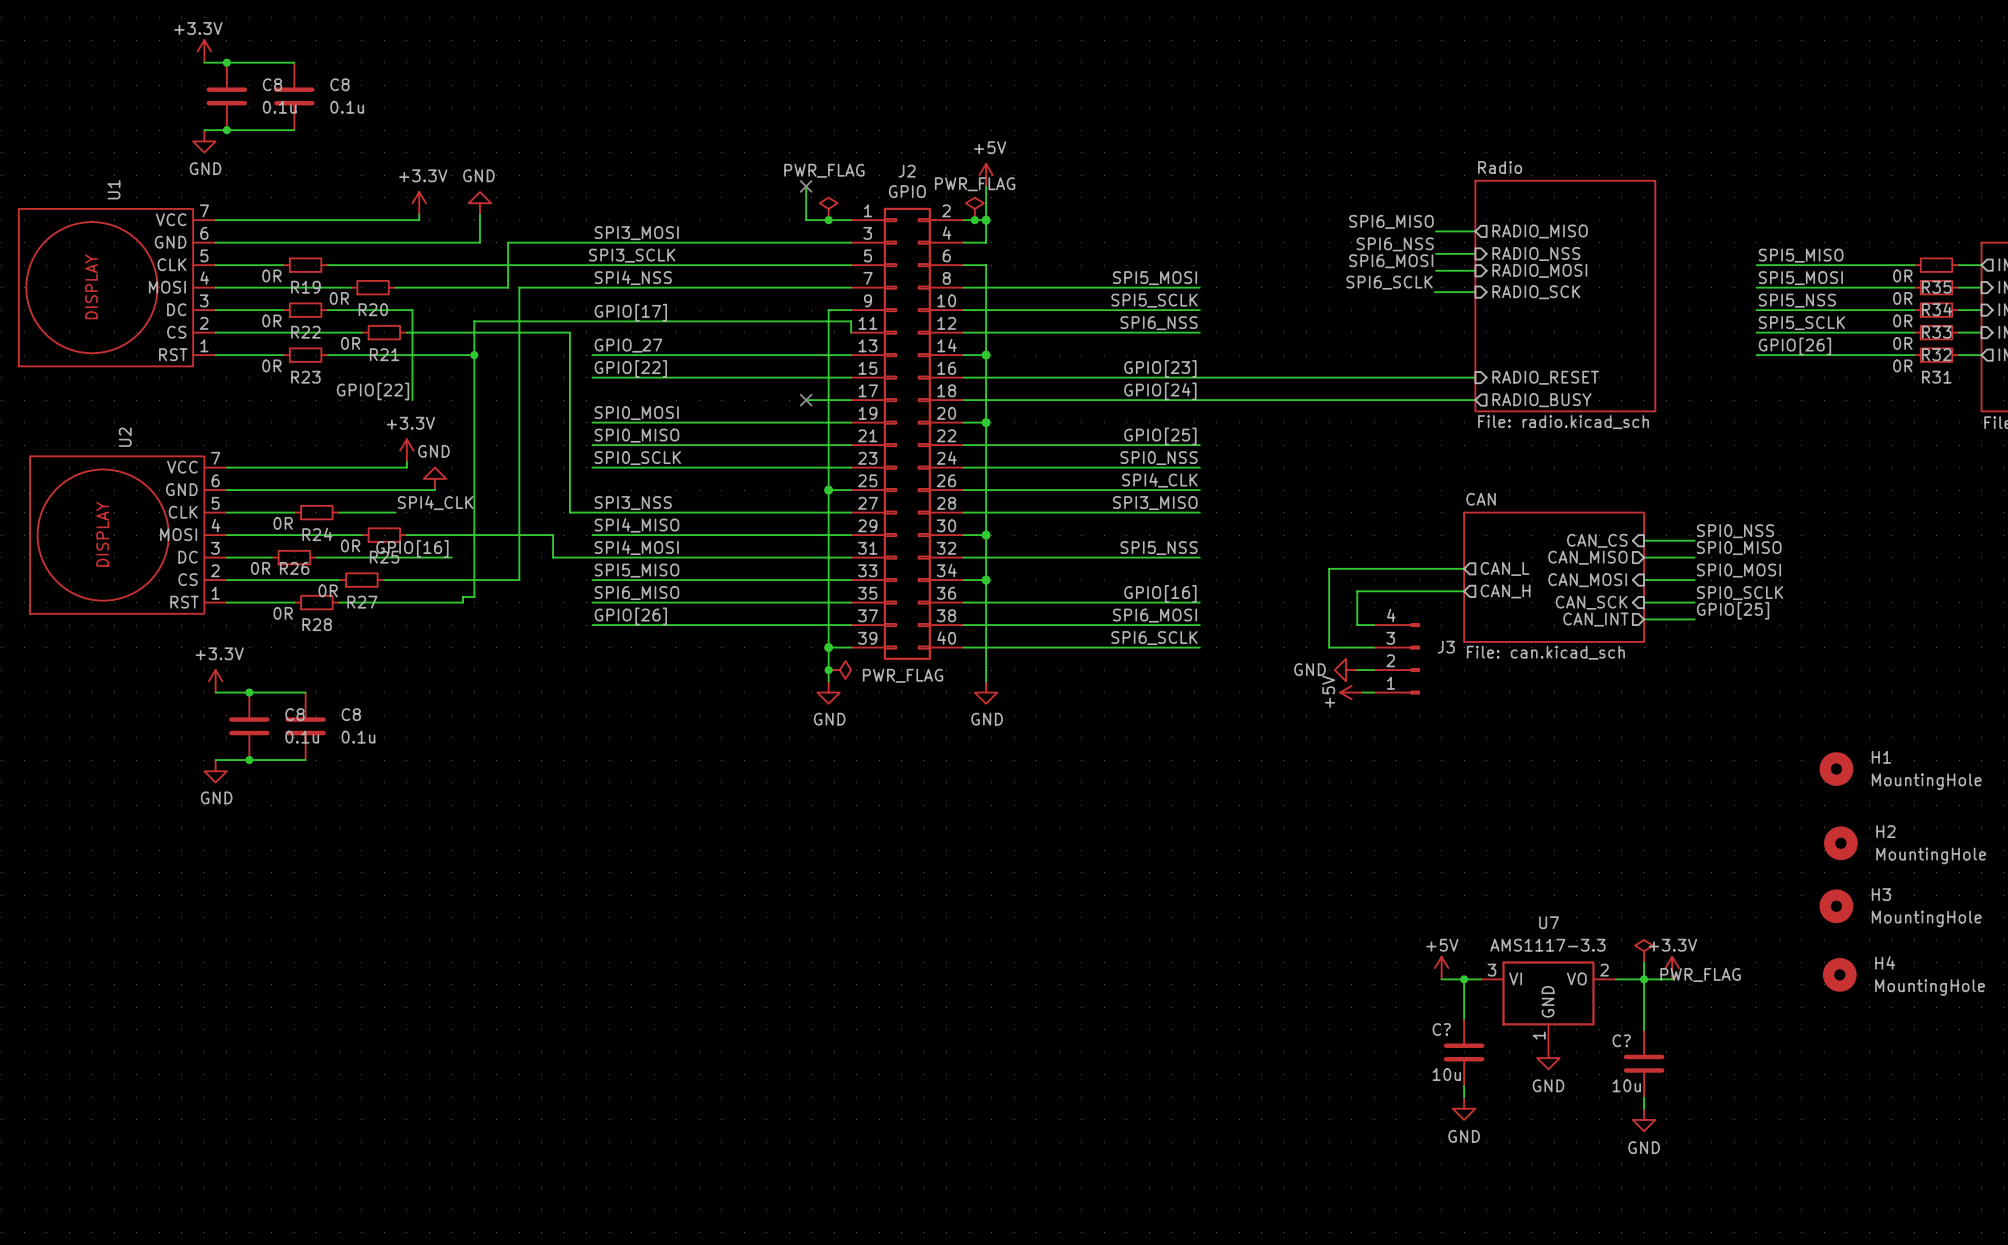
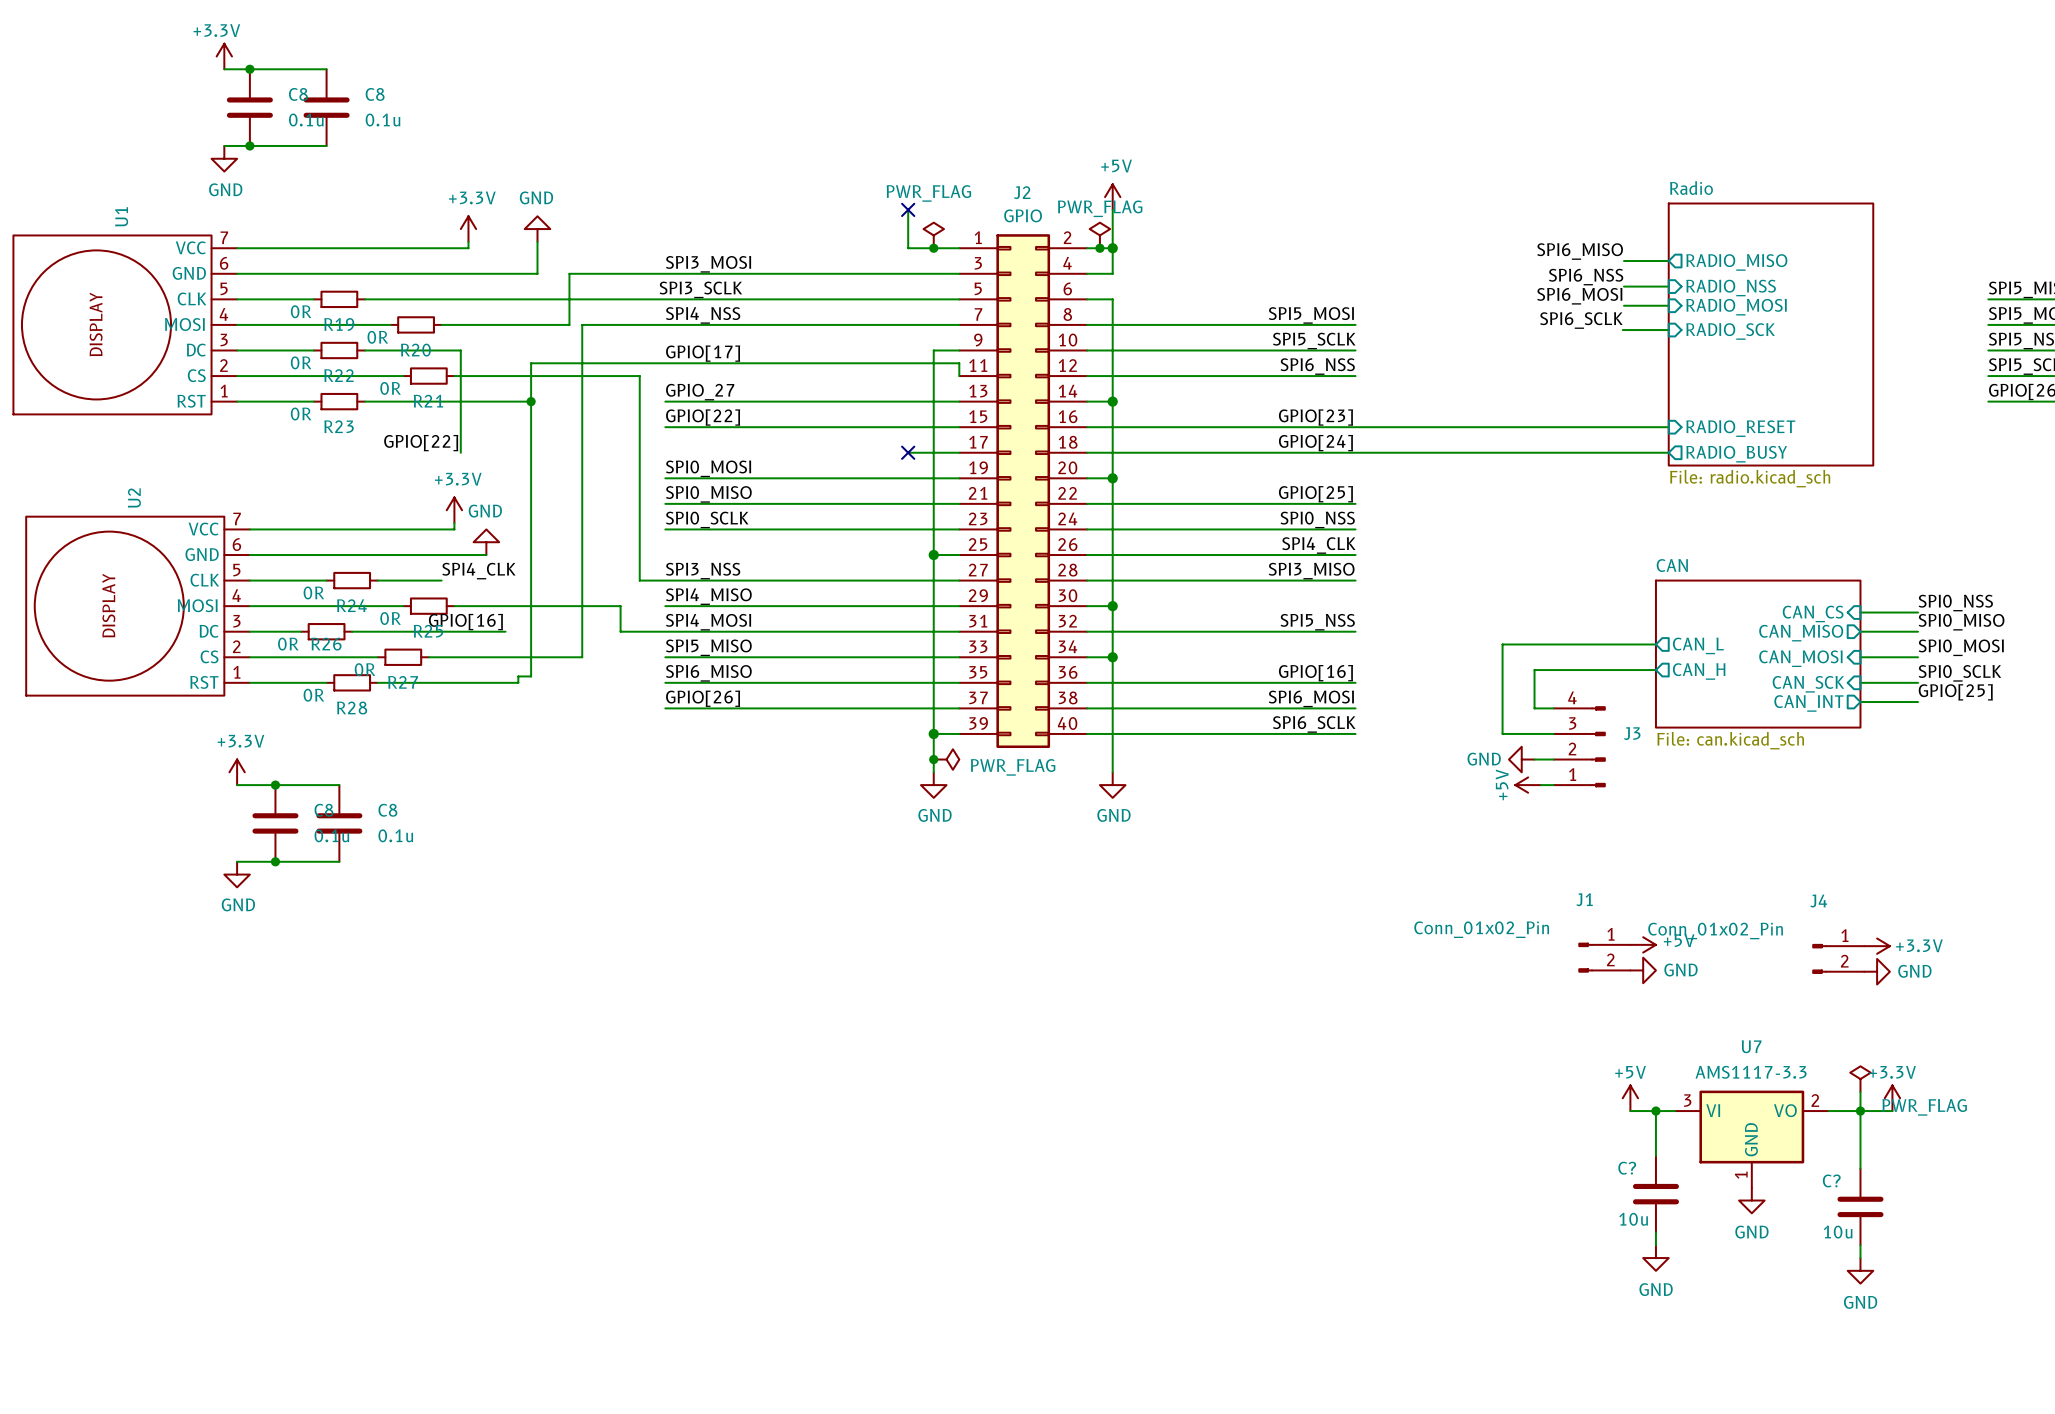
power symbol: none -> +5V (1643, 944)
power symbol: none -> +3.3V (1877, 946)
J1: none -> Conn_01x02_Pin (1604, 957)
J4: none -> Conn_01x02_Pin (1838, 958)
power symbol: none -> GND (1643, 970)
power symbol: none -> GND (1877, 971)

